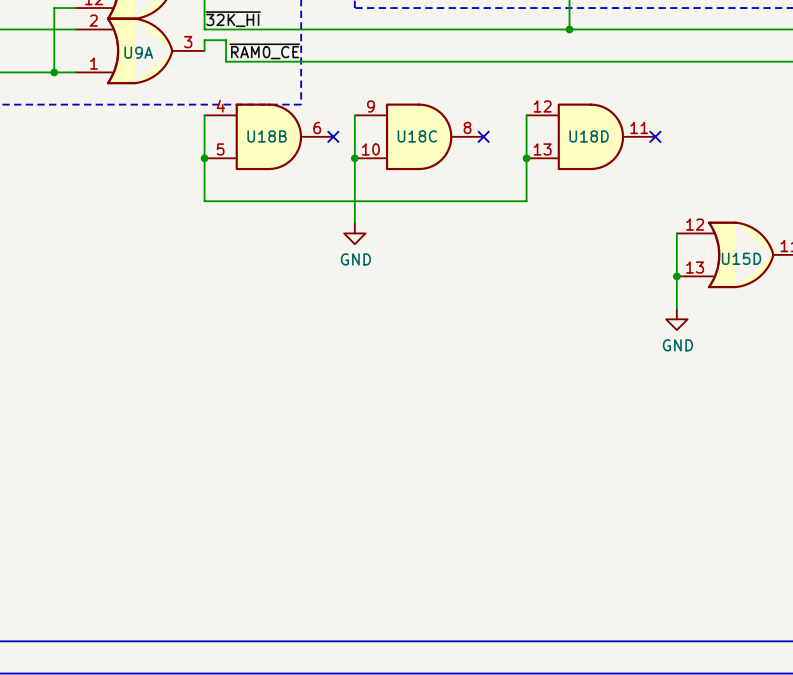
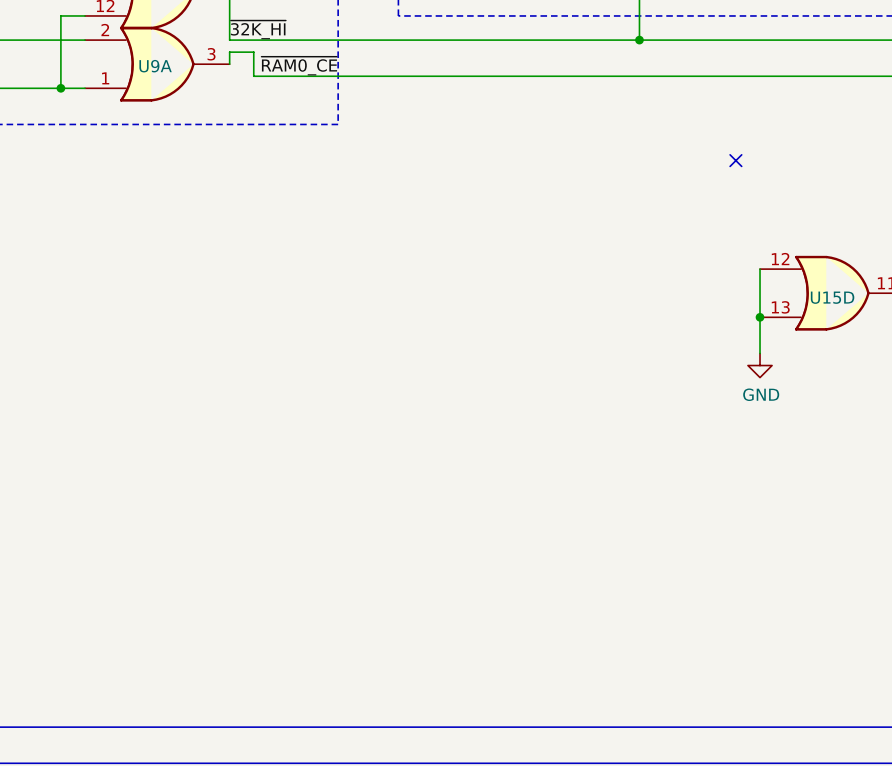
wire: (204, 115) (204, 201) (526, 201) (526, 115) -> none
wire: (354, 115) (354, 222) -> none
U18B: (268, 136) -> none
no-connect mark: (333, 136) -> none
U18C: (419, 136) -> none
no-connect mark: (483, 136) -> none
U18D: (590, 136) -> none
junction: (204, 158) -> none
junction: (354, 158) -> none
junction: (526, 158) -> none
power symbol: GND (354, 233) -> none

